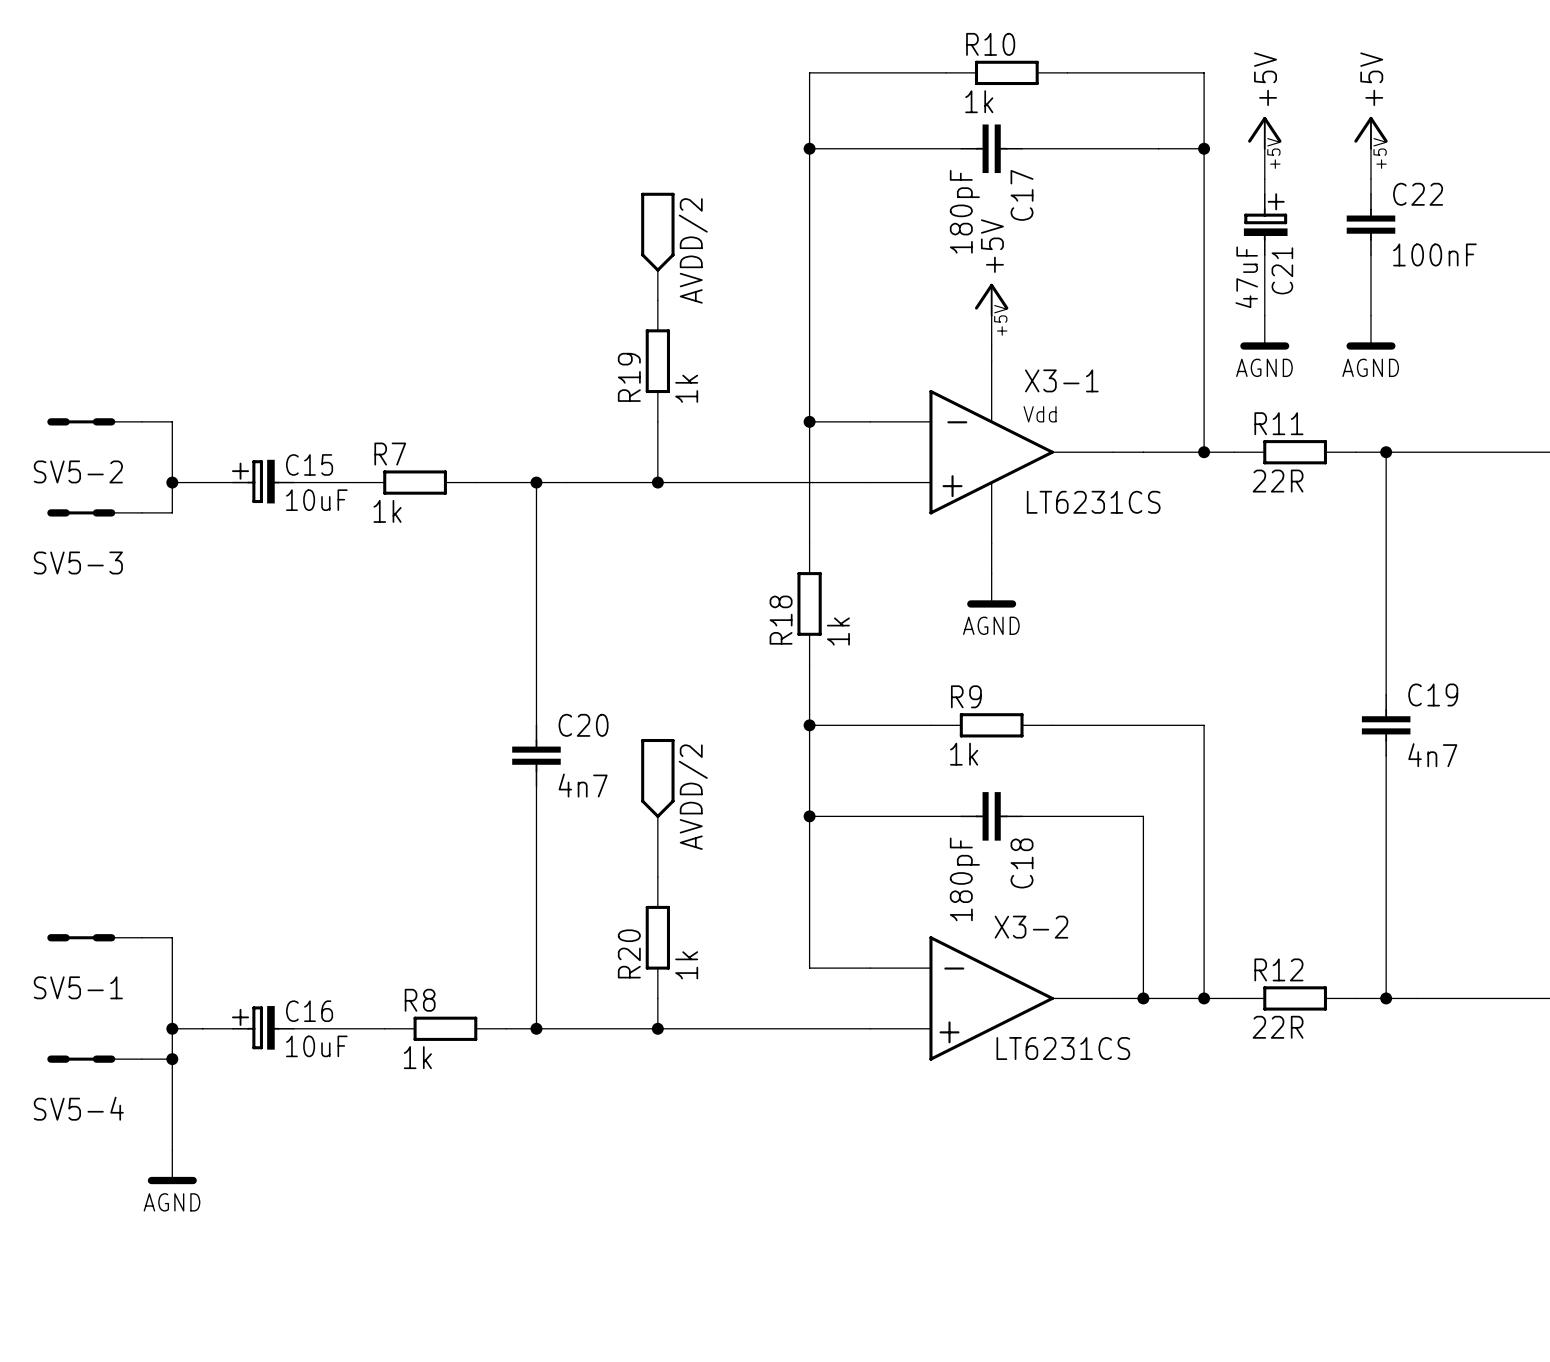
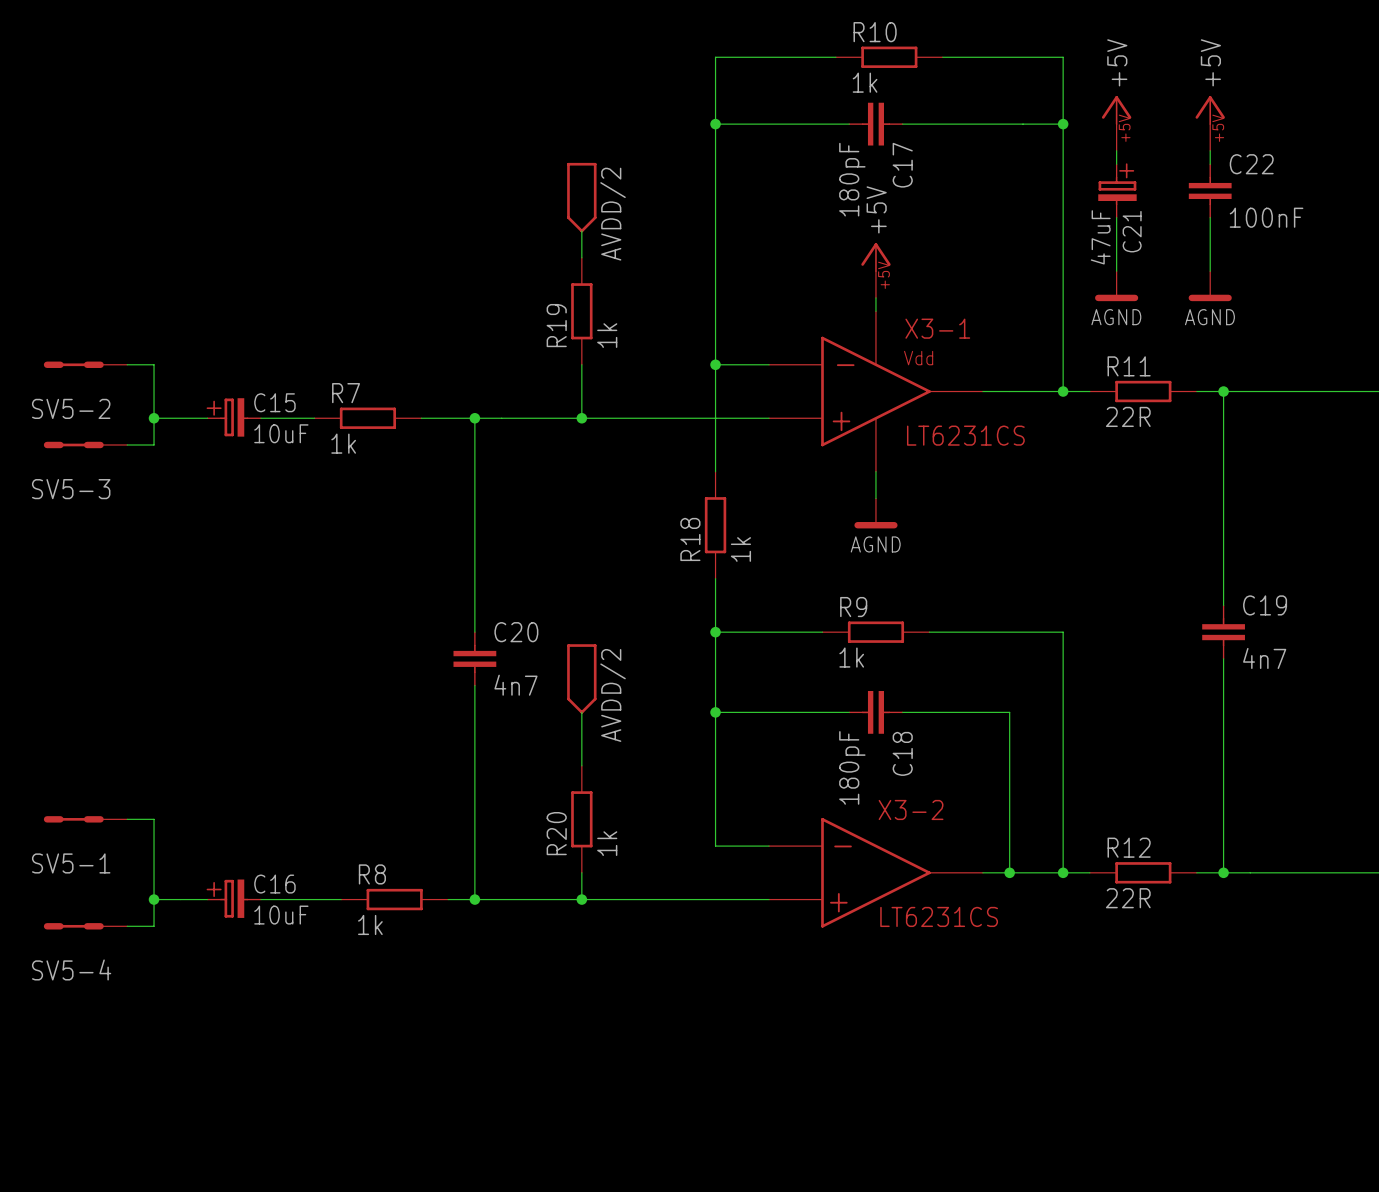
wire: (172, 1059) (172, 1150) -> none
junction: (172, 1059) -> none
power symbol: (172, 1167) -> none

